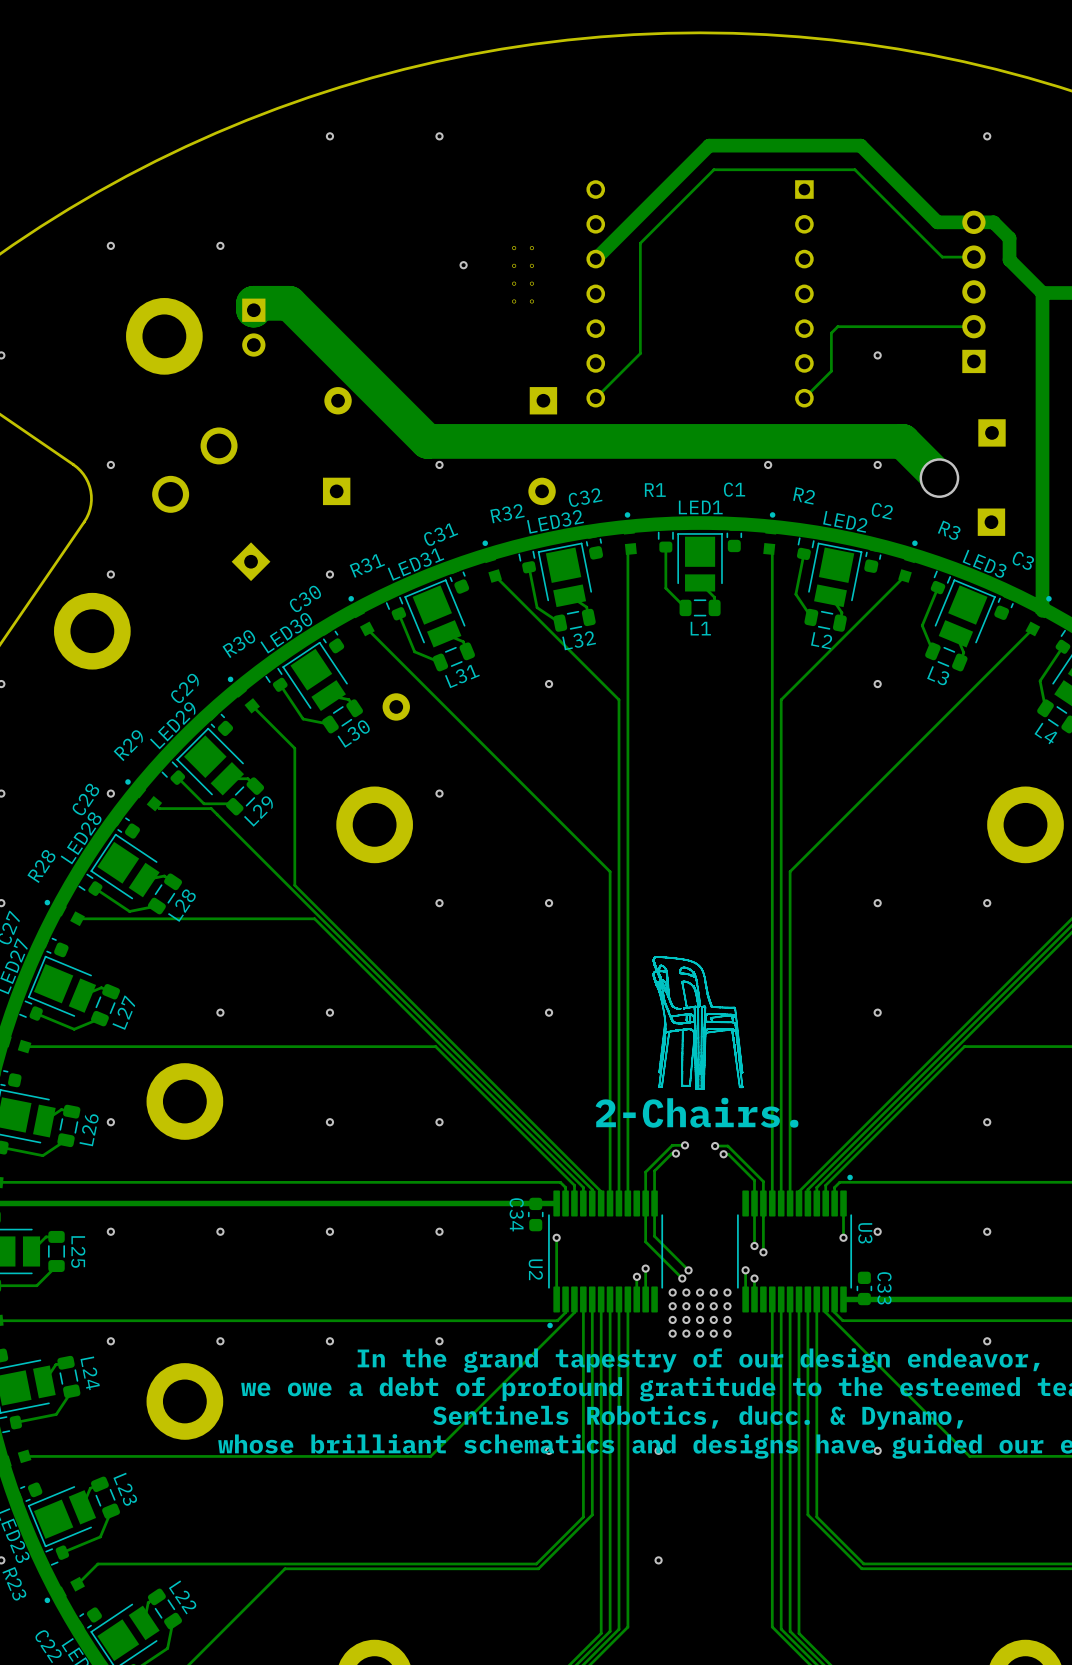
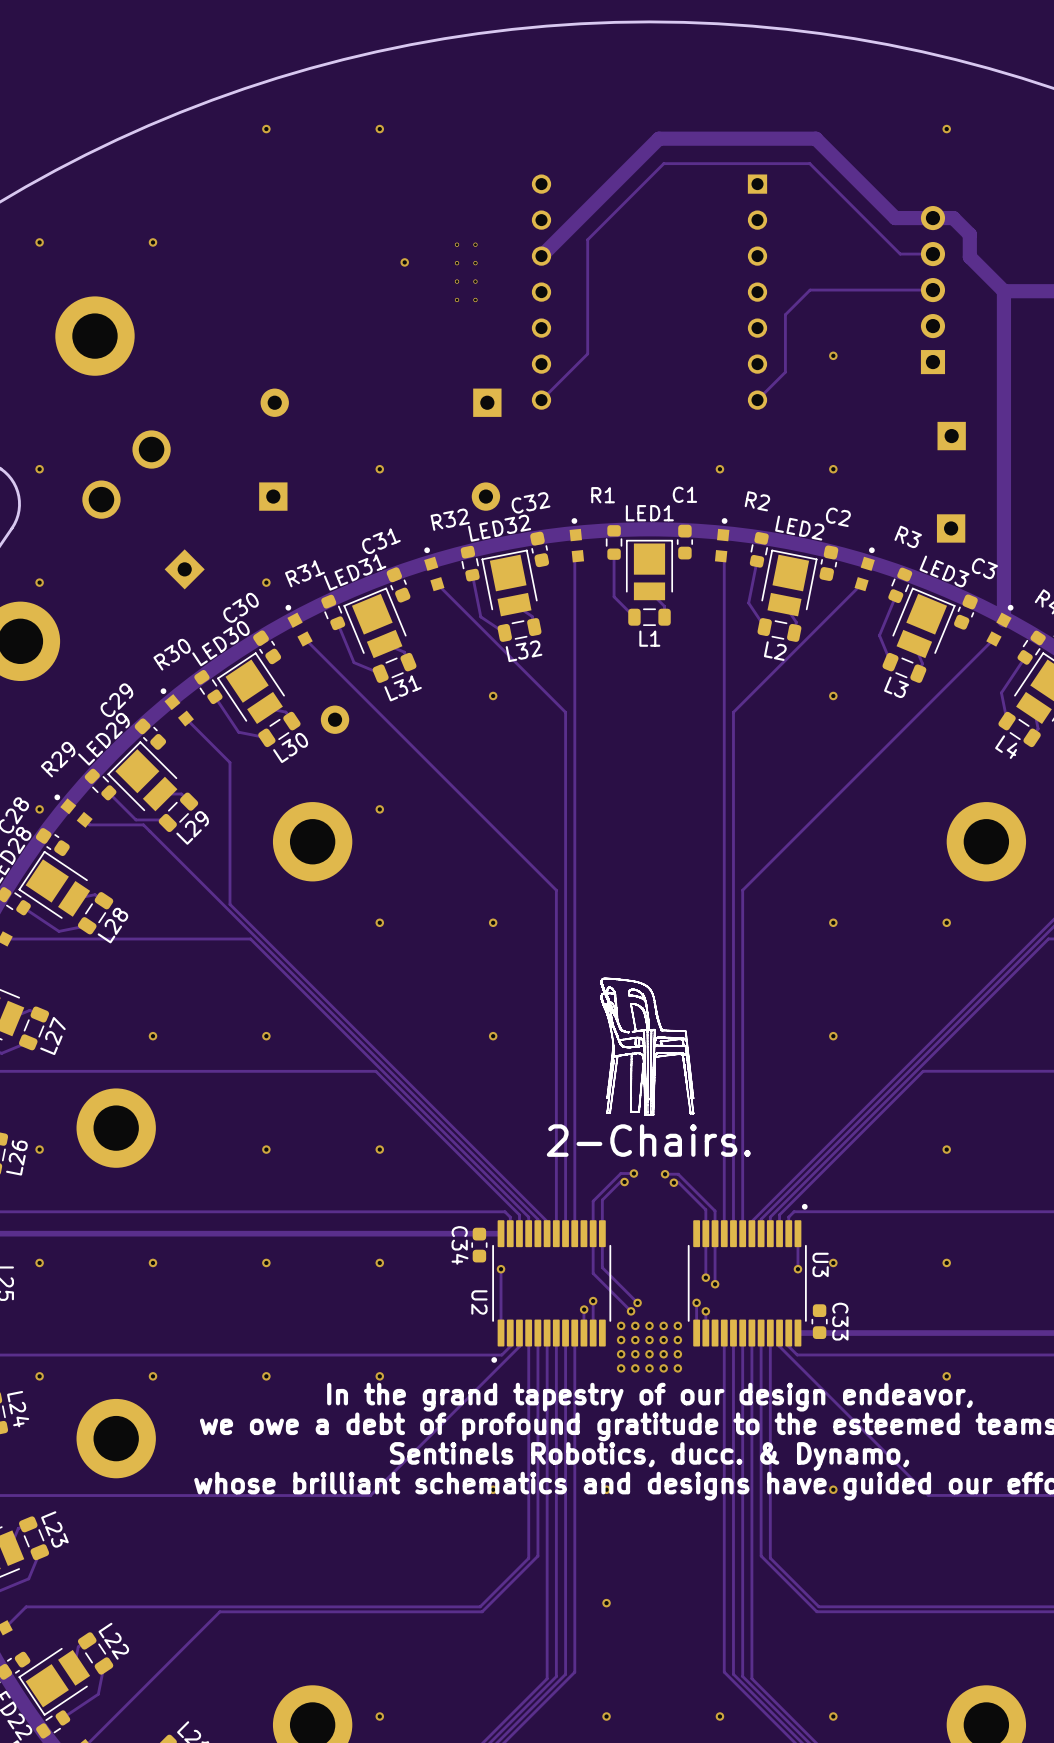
track: (253, 310) (253, 303) (289, 303) (427, 441) (902, 441) (939, 478) -> none
track: (973, 326) (837, 326) (831, 333) -> (932, 290) (810, 290) (785, 314) (785, 332)
part: (253, 327) -> none
via: (939, 478) -> none

